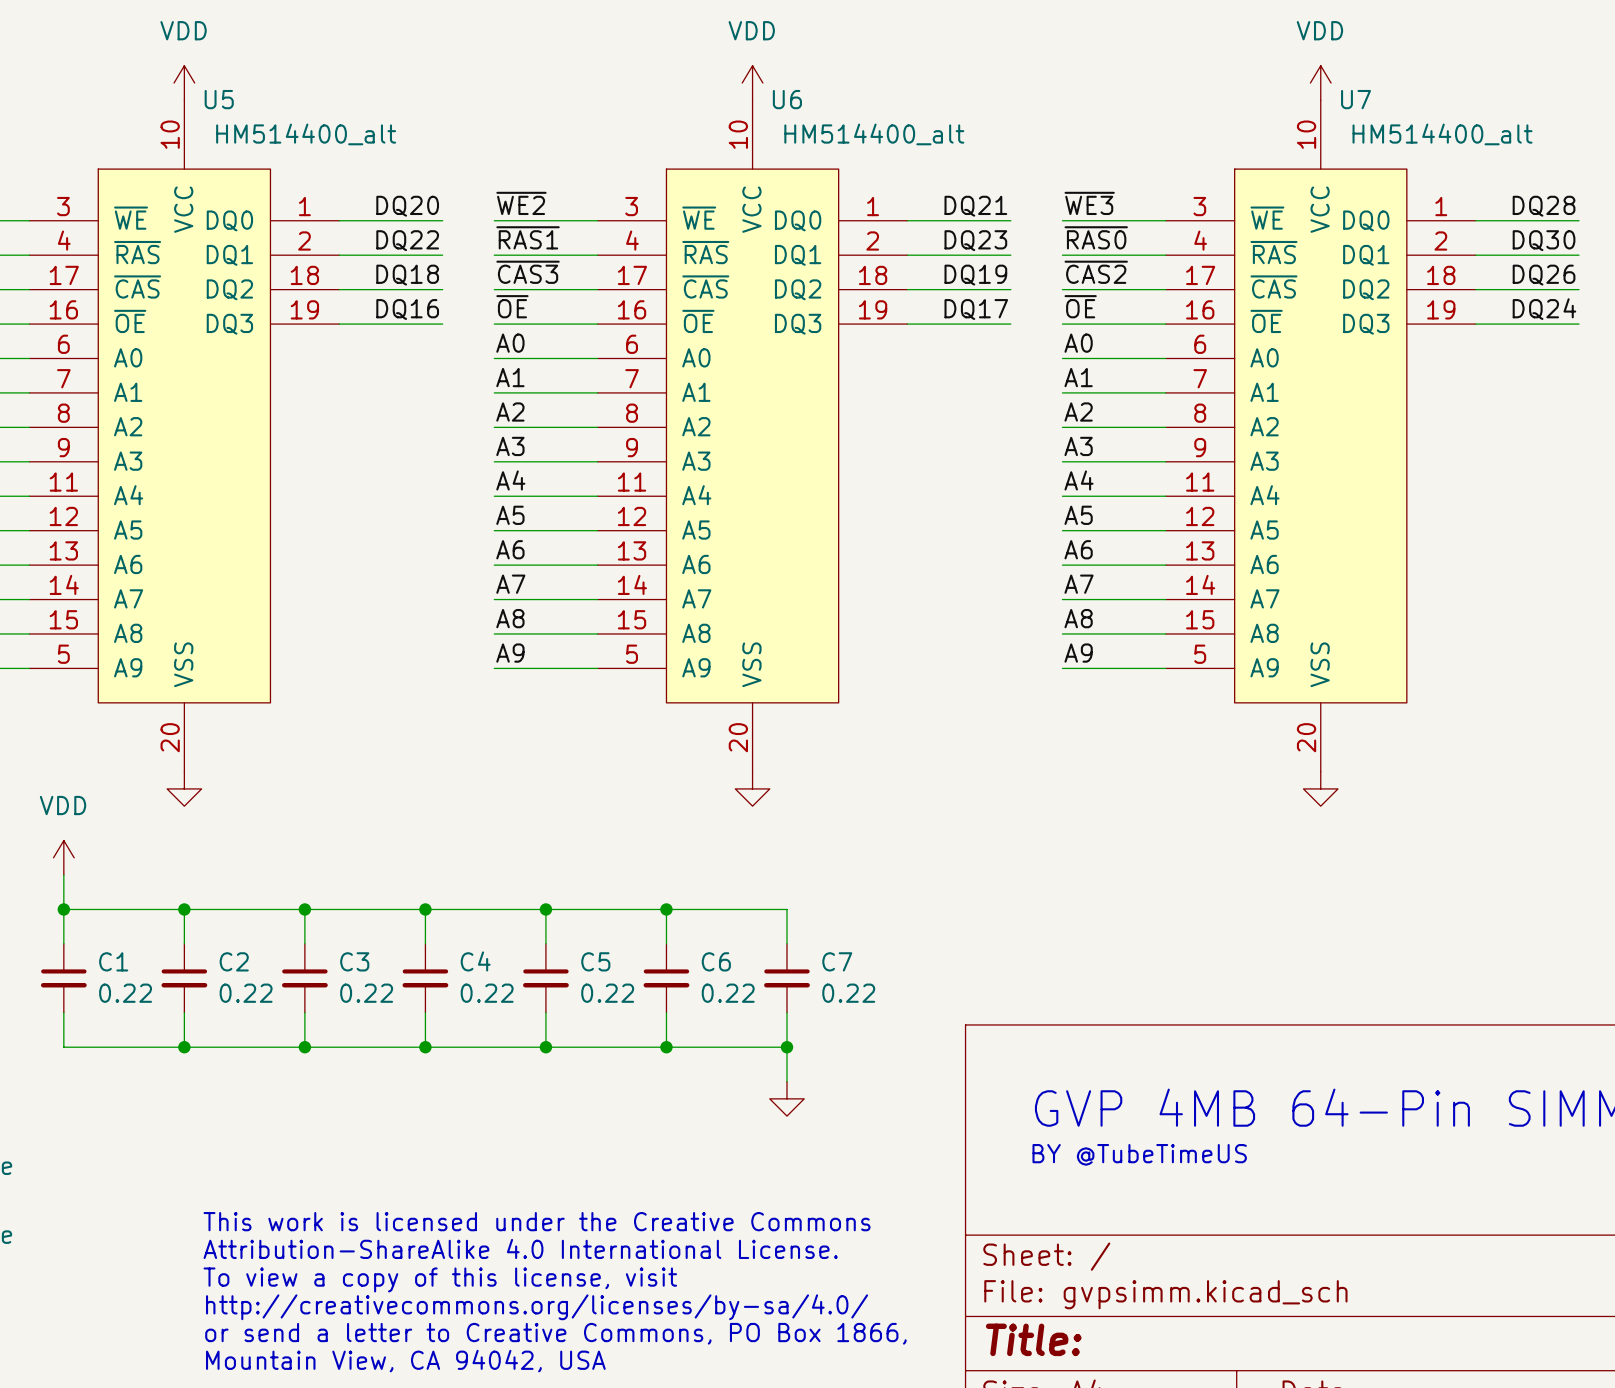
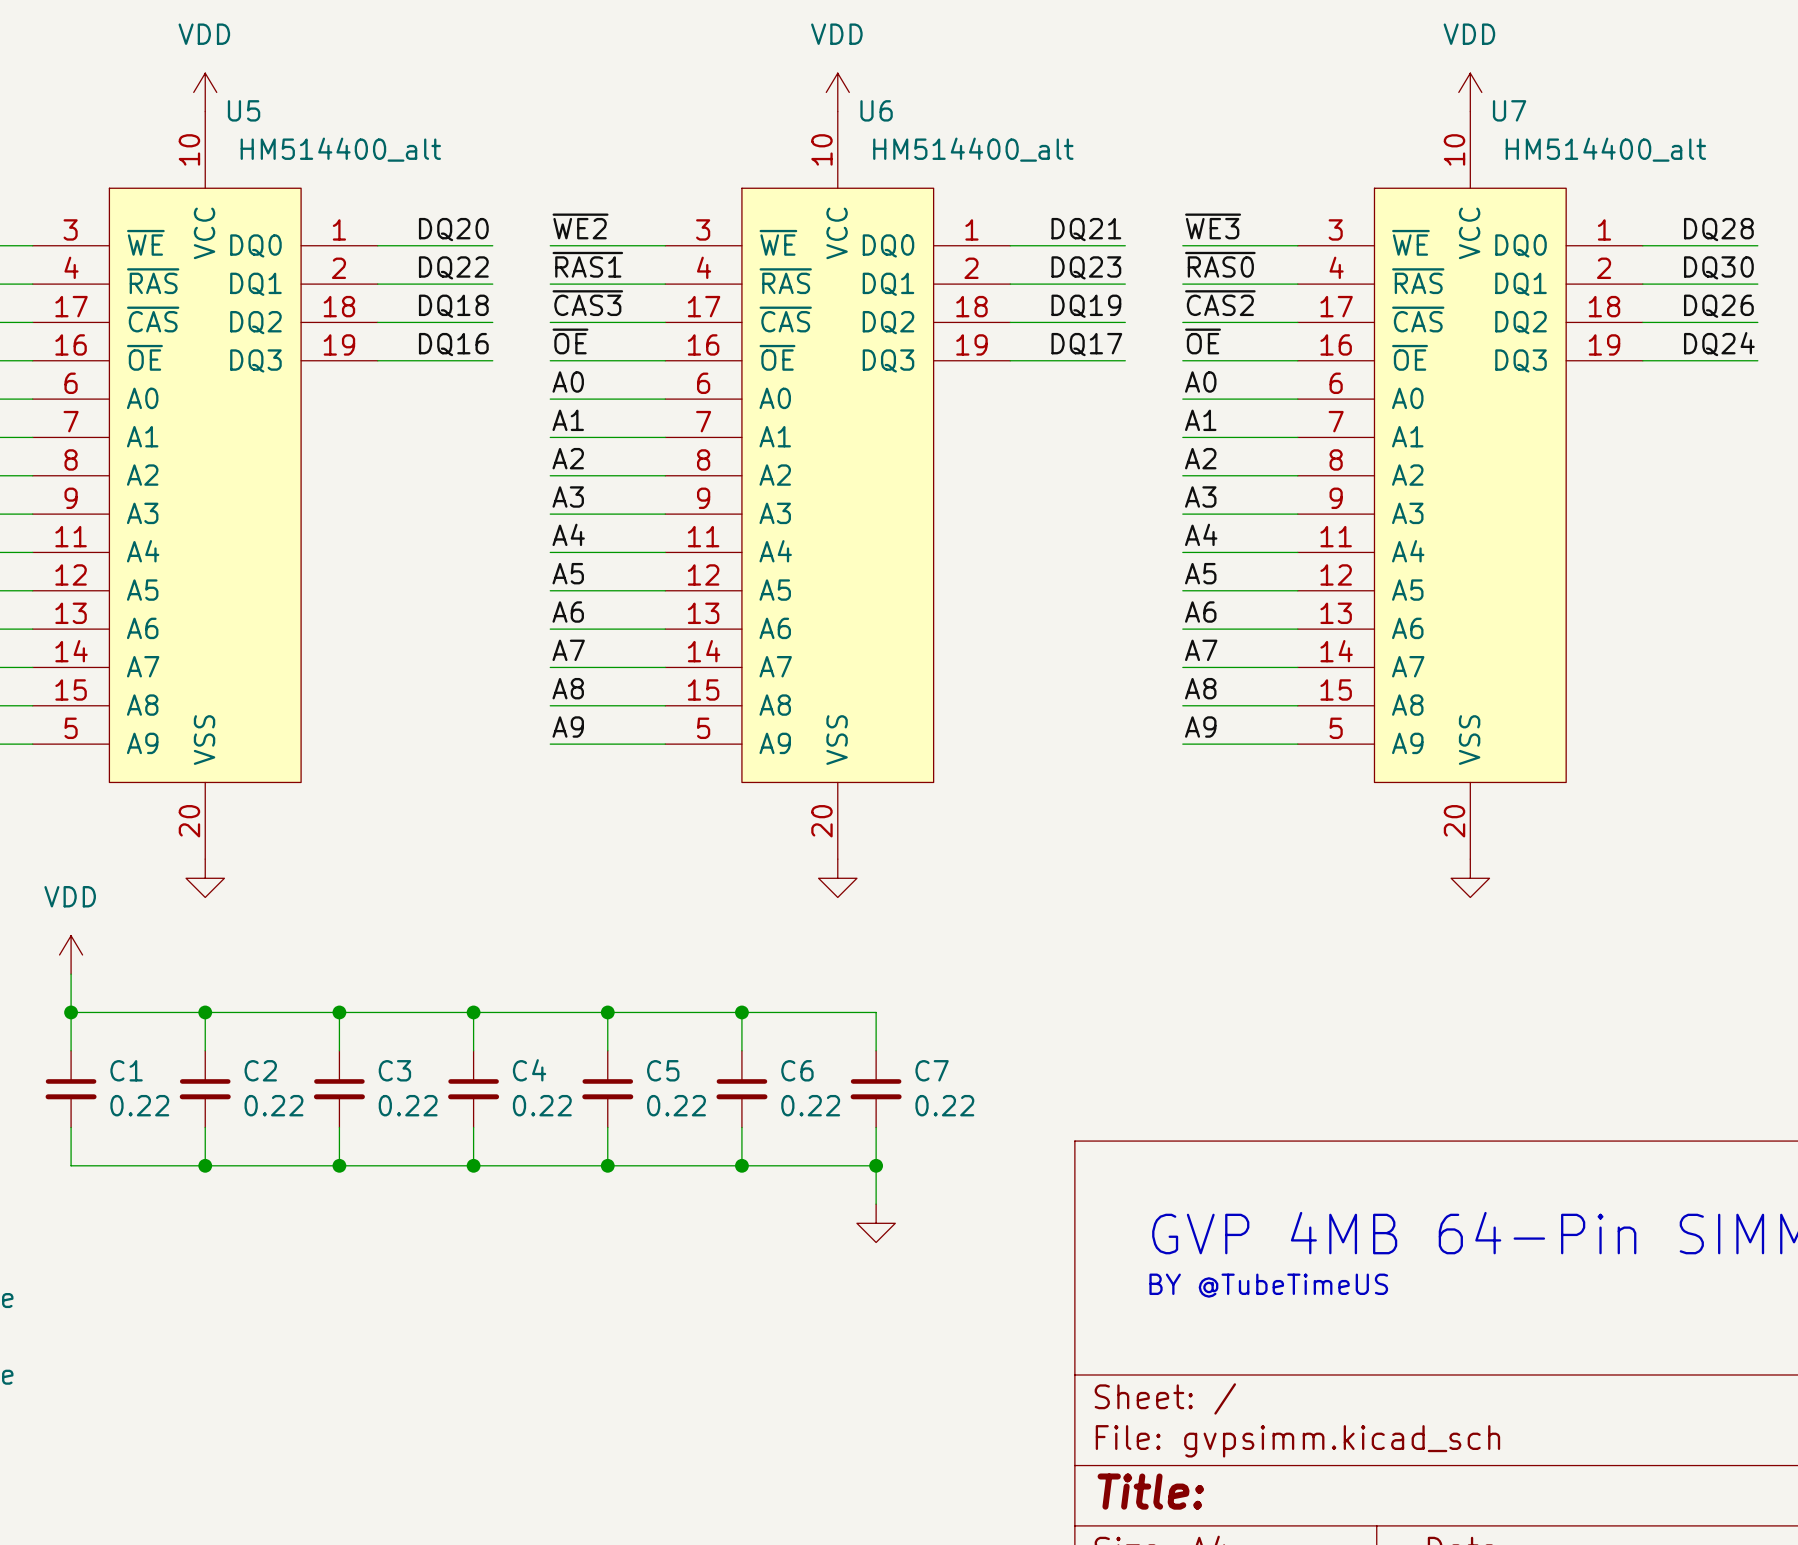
text: This work is licensed under the Creative Commons (537, 1221) -> none
text: Attribution-ShareAlike 4.0 International License. (520, 1248) -> none
text: To view a copy of this license, visit (440, 1279) -> none
text: http://creativecommons.org/licenses/by-sa/4.0/ (537, 1307) -> none
text: or send a letter to Creative Commons, PO Box 1866, (555, 1333) -> none
text: Mountain View, CA 94042, USA (405, 1361) -> none

